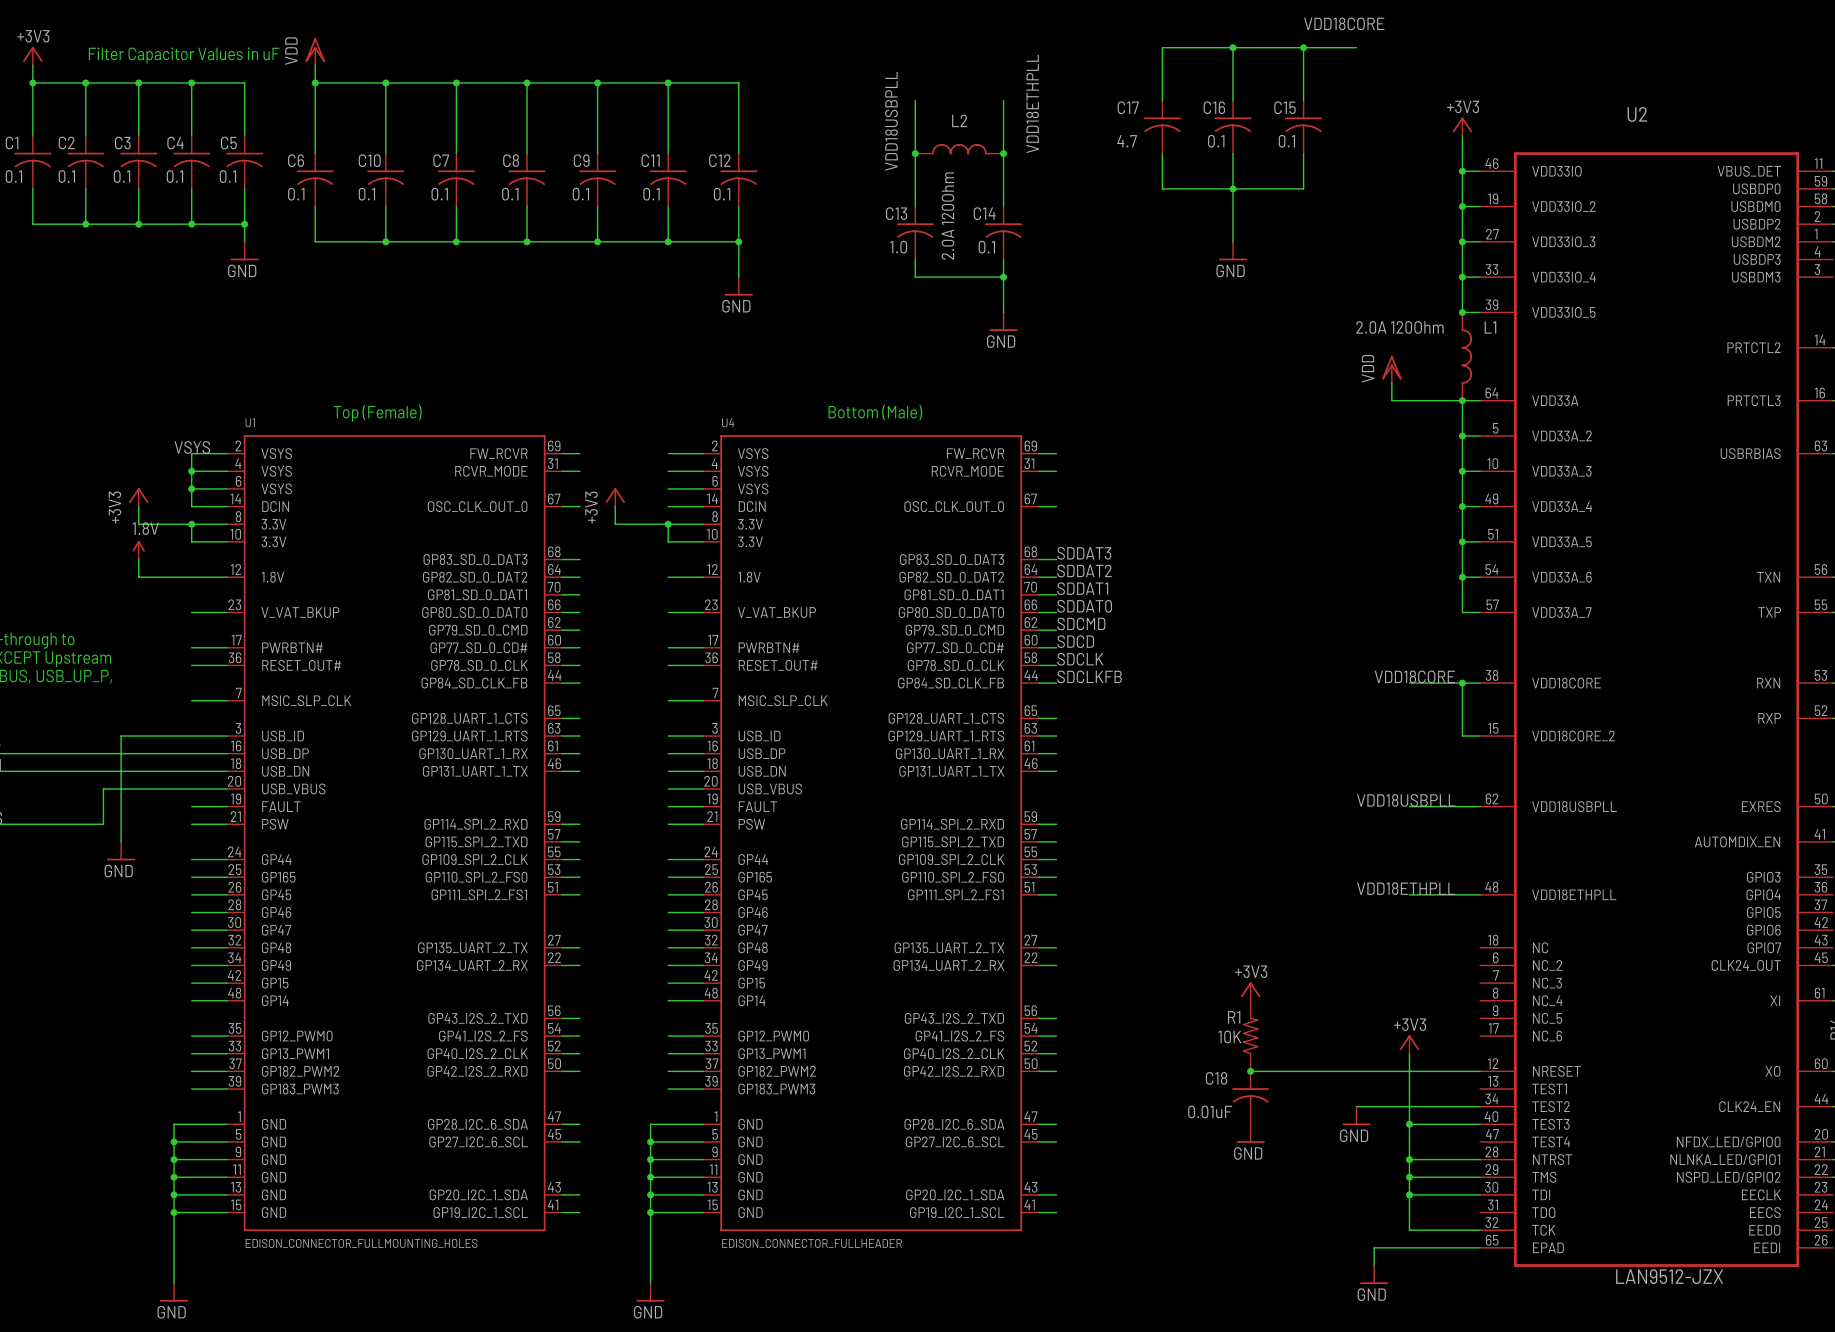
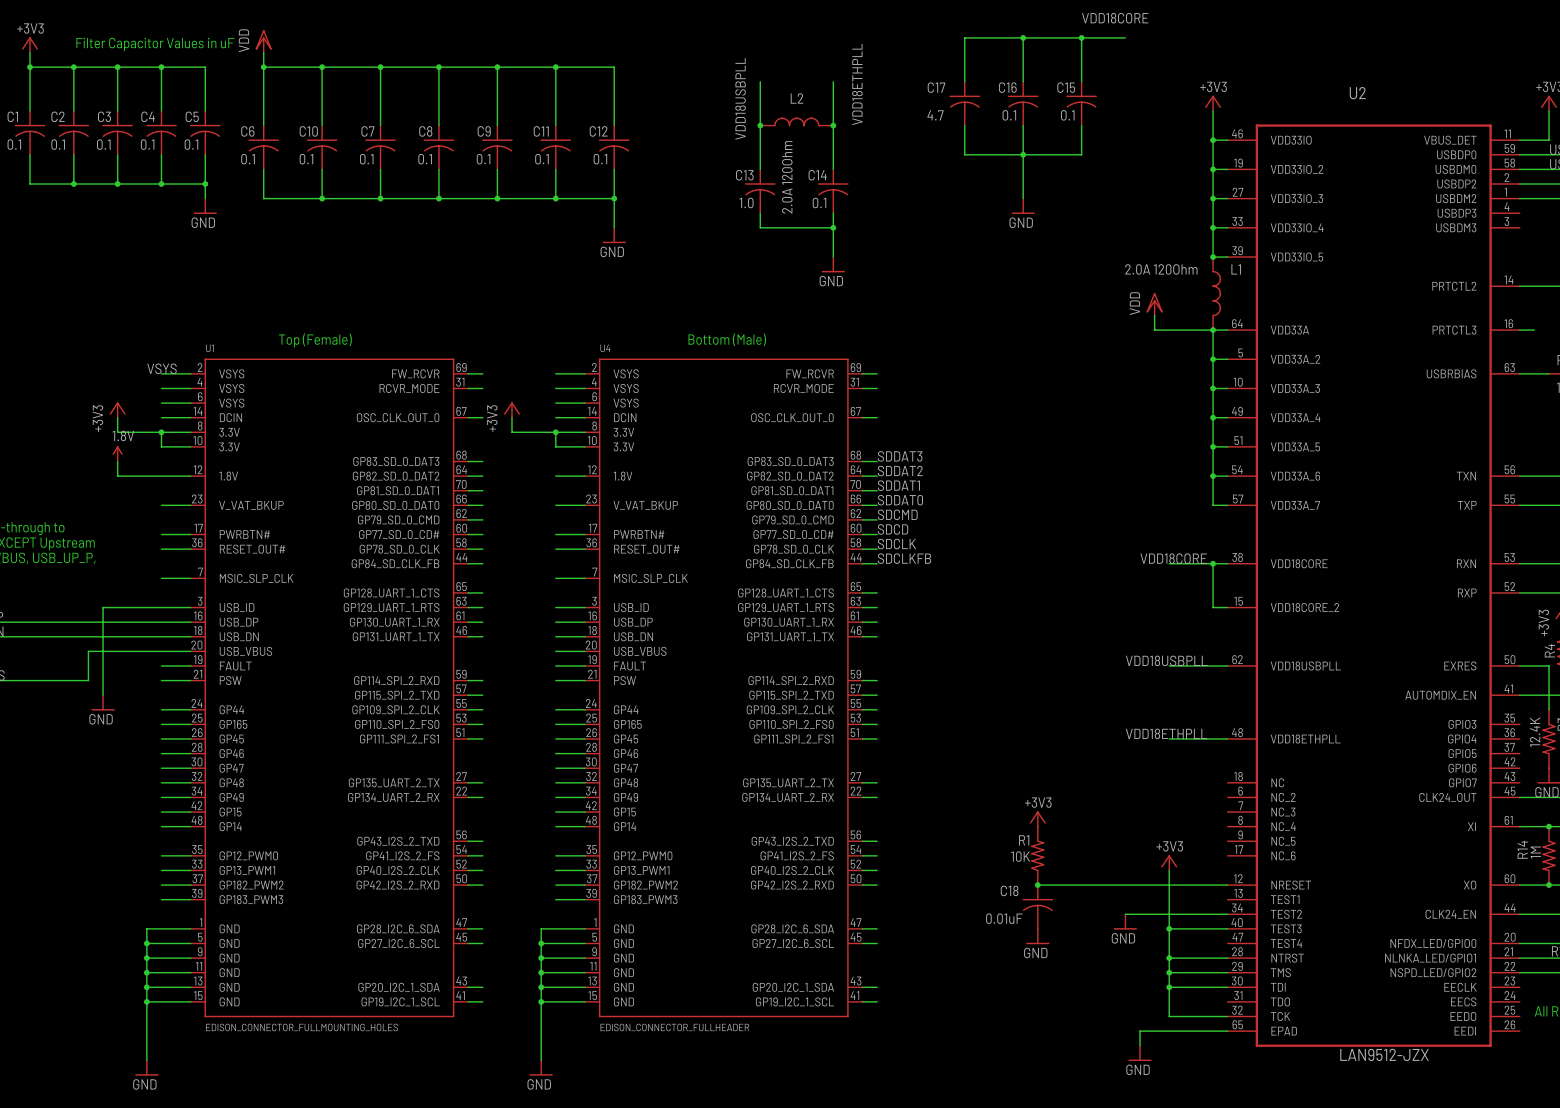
wire: (191, 453) (191, 506) -> none
junction: (191, 471) -> none
junction: (191, 488) -> none

